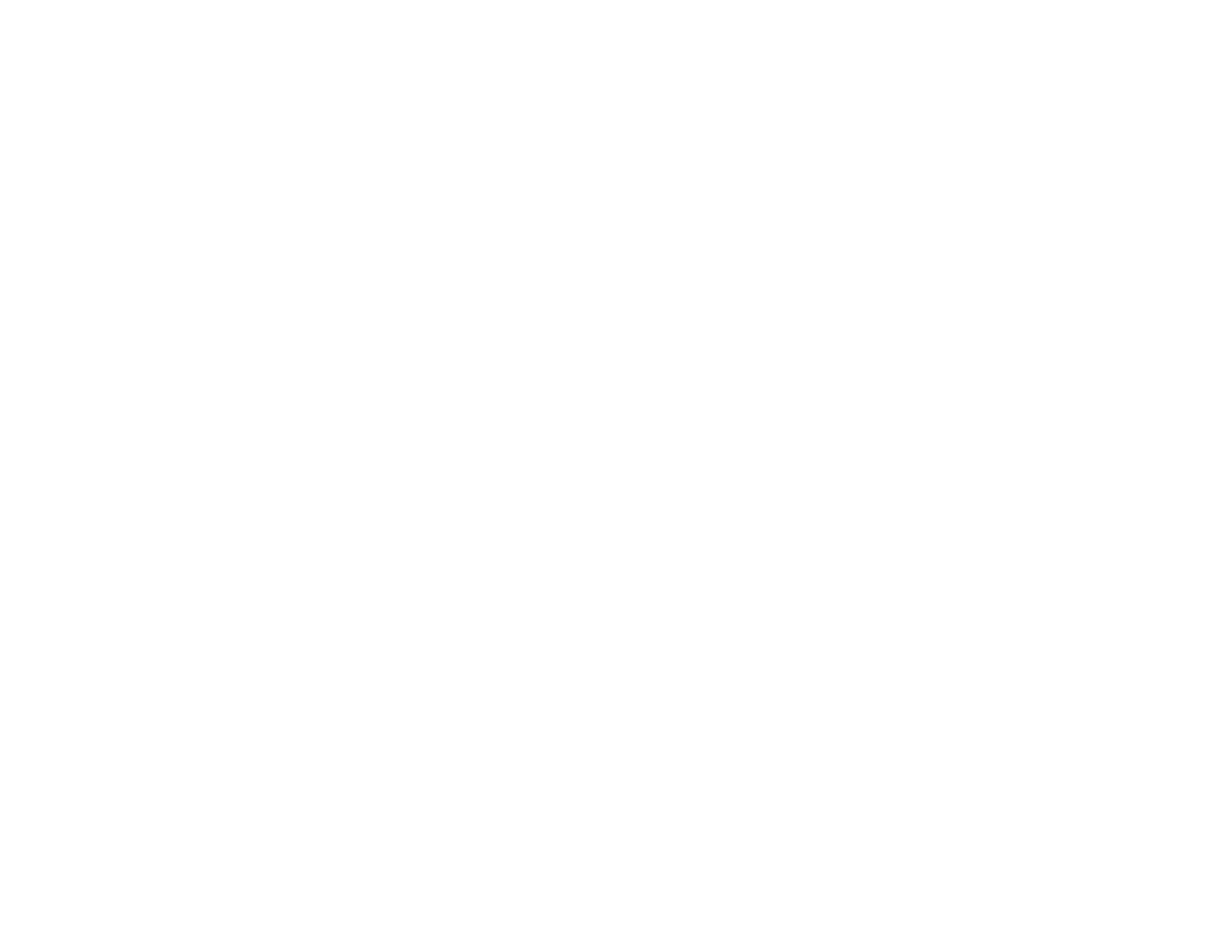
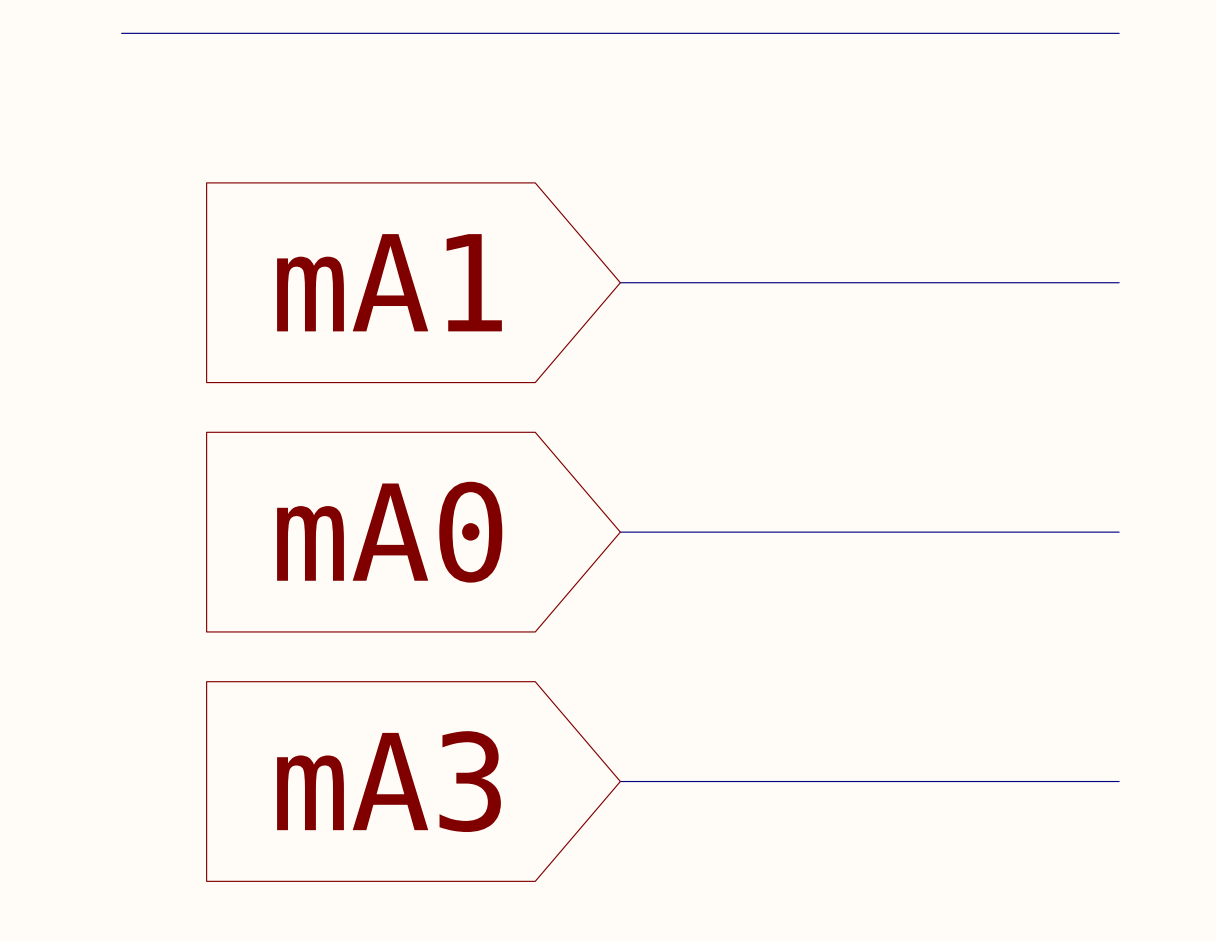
wire: none -> (121, 33) (1119, 33)
global label: none -> mA1 (389, 282)
wire: none -> (620, 282) (1119, 282)
global label: none -> mA0 (389, 532)
wire: none -> (620, 532) (1119, 532)
global label: none -> mA3 (389, 781)
wire: none -> (620, 781) (1119, 781)

